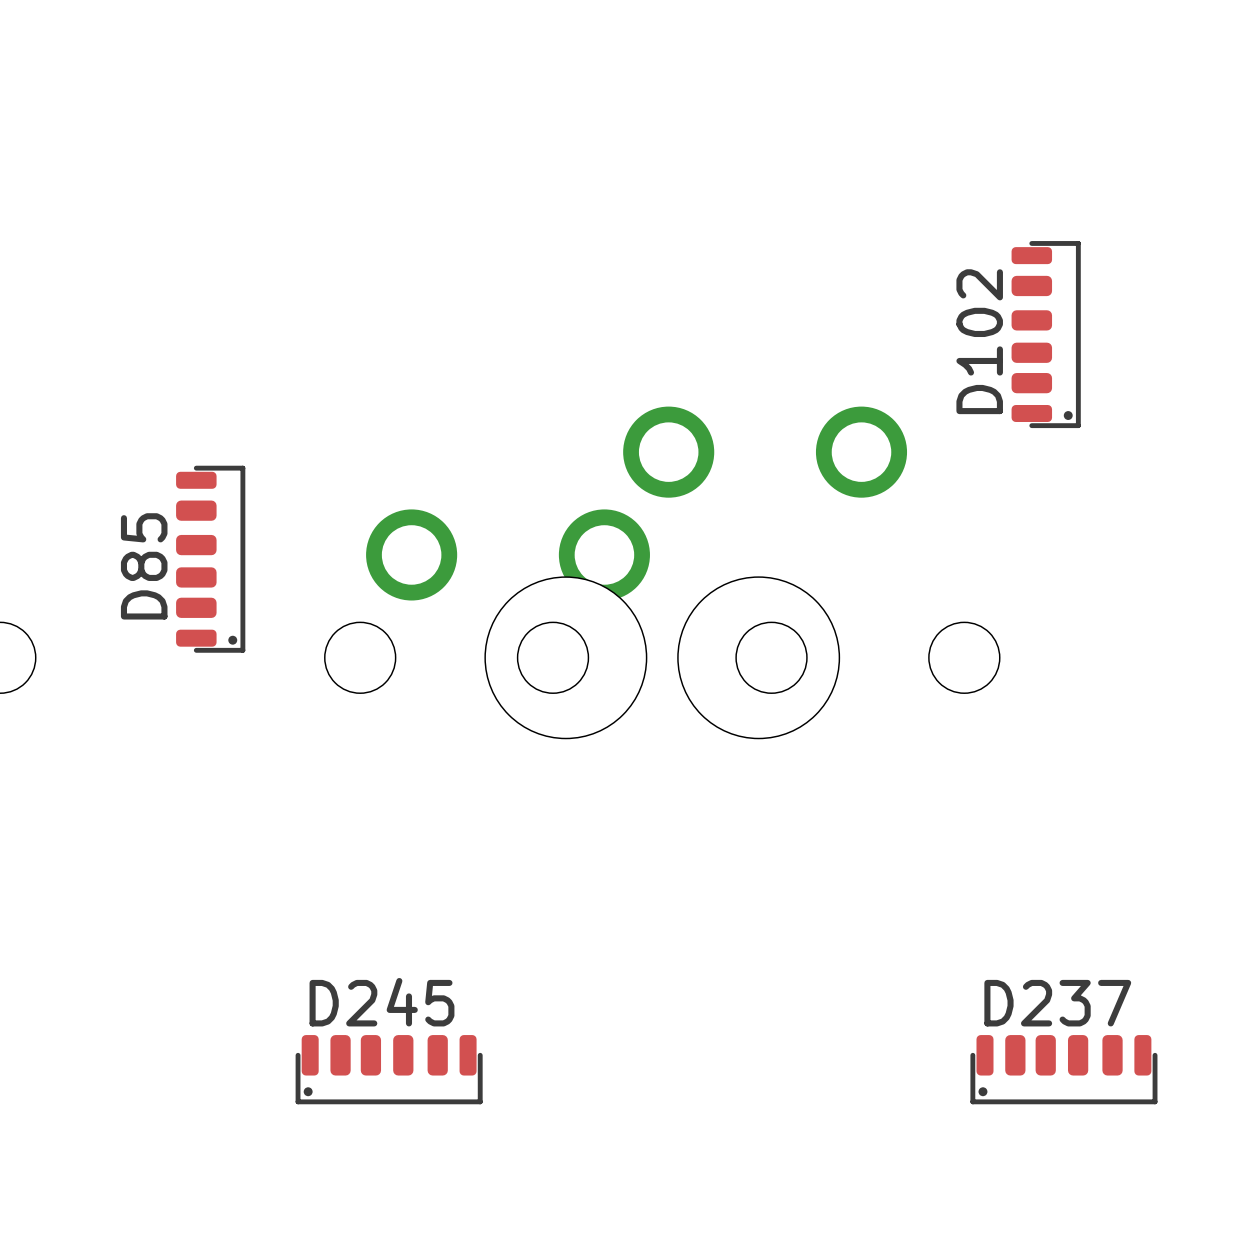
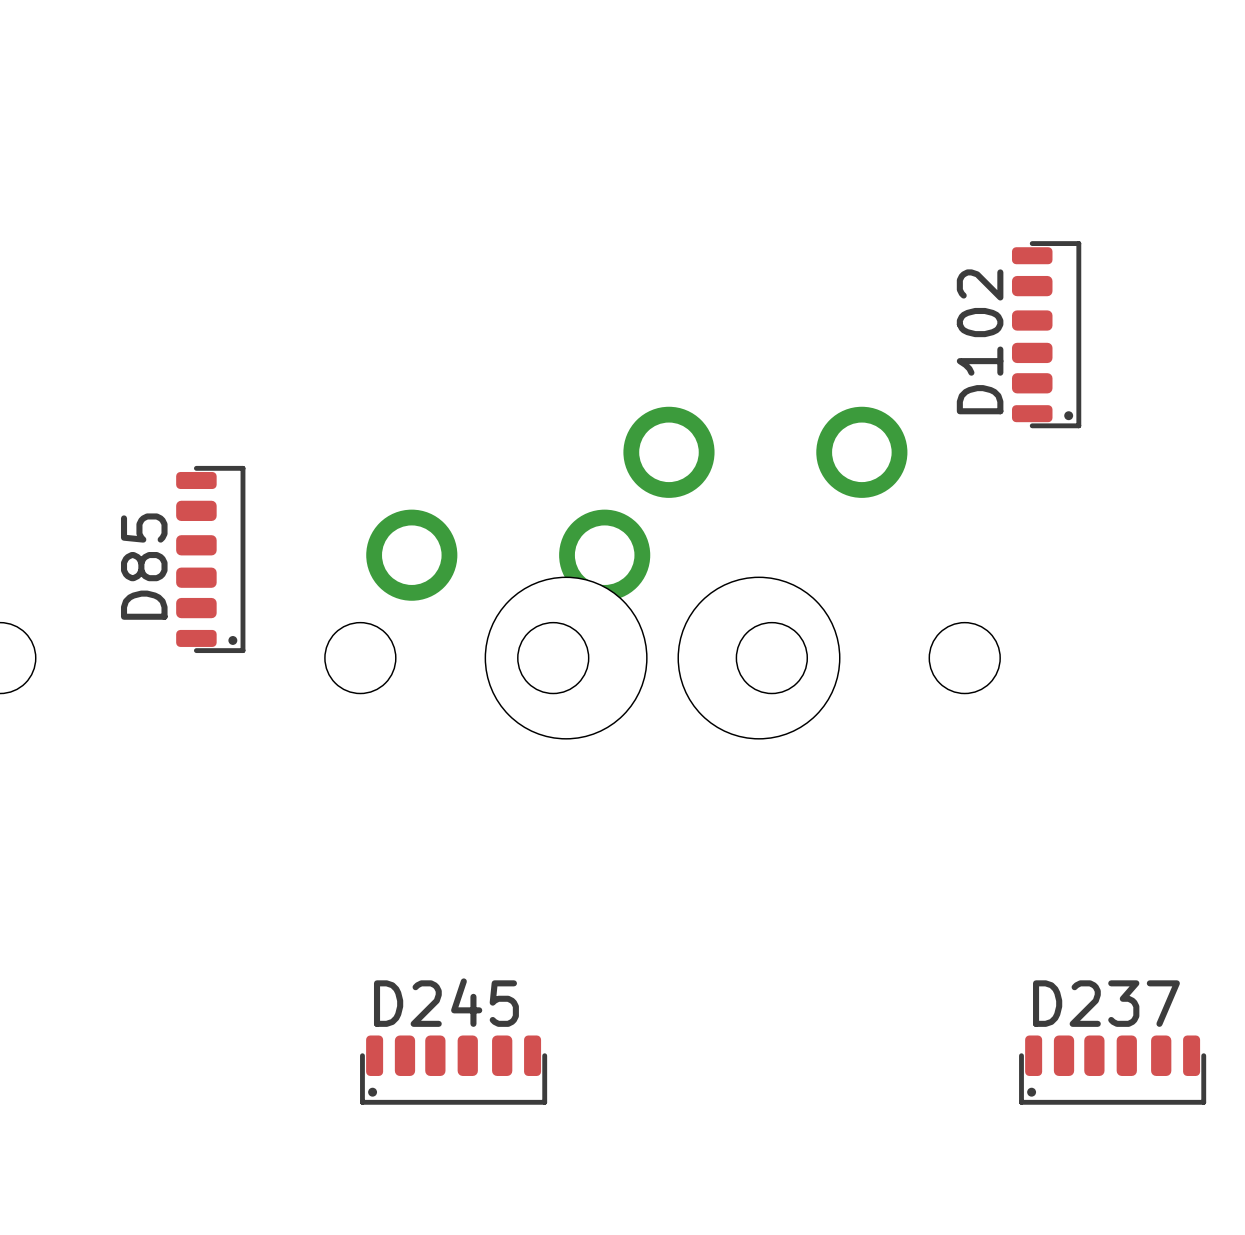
D245 position: (389, 1069) -> (453, 1070)
D237 position: (1063, 1069) -> (1112, 1070)

